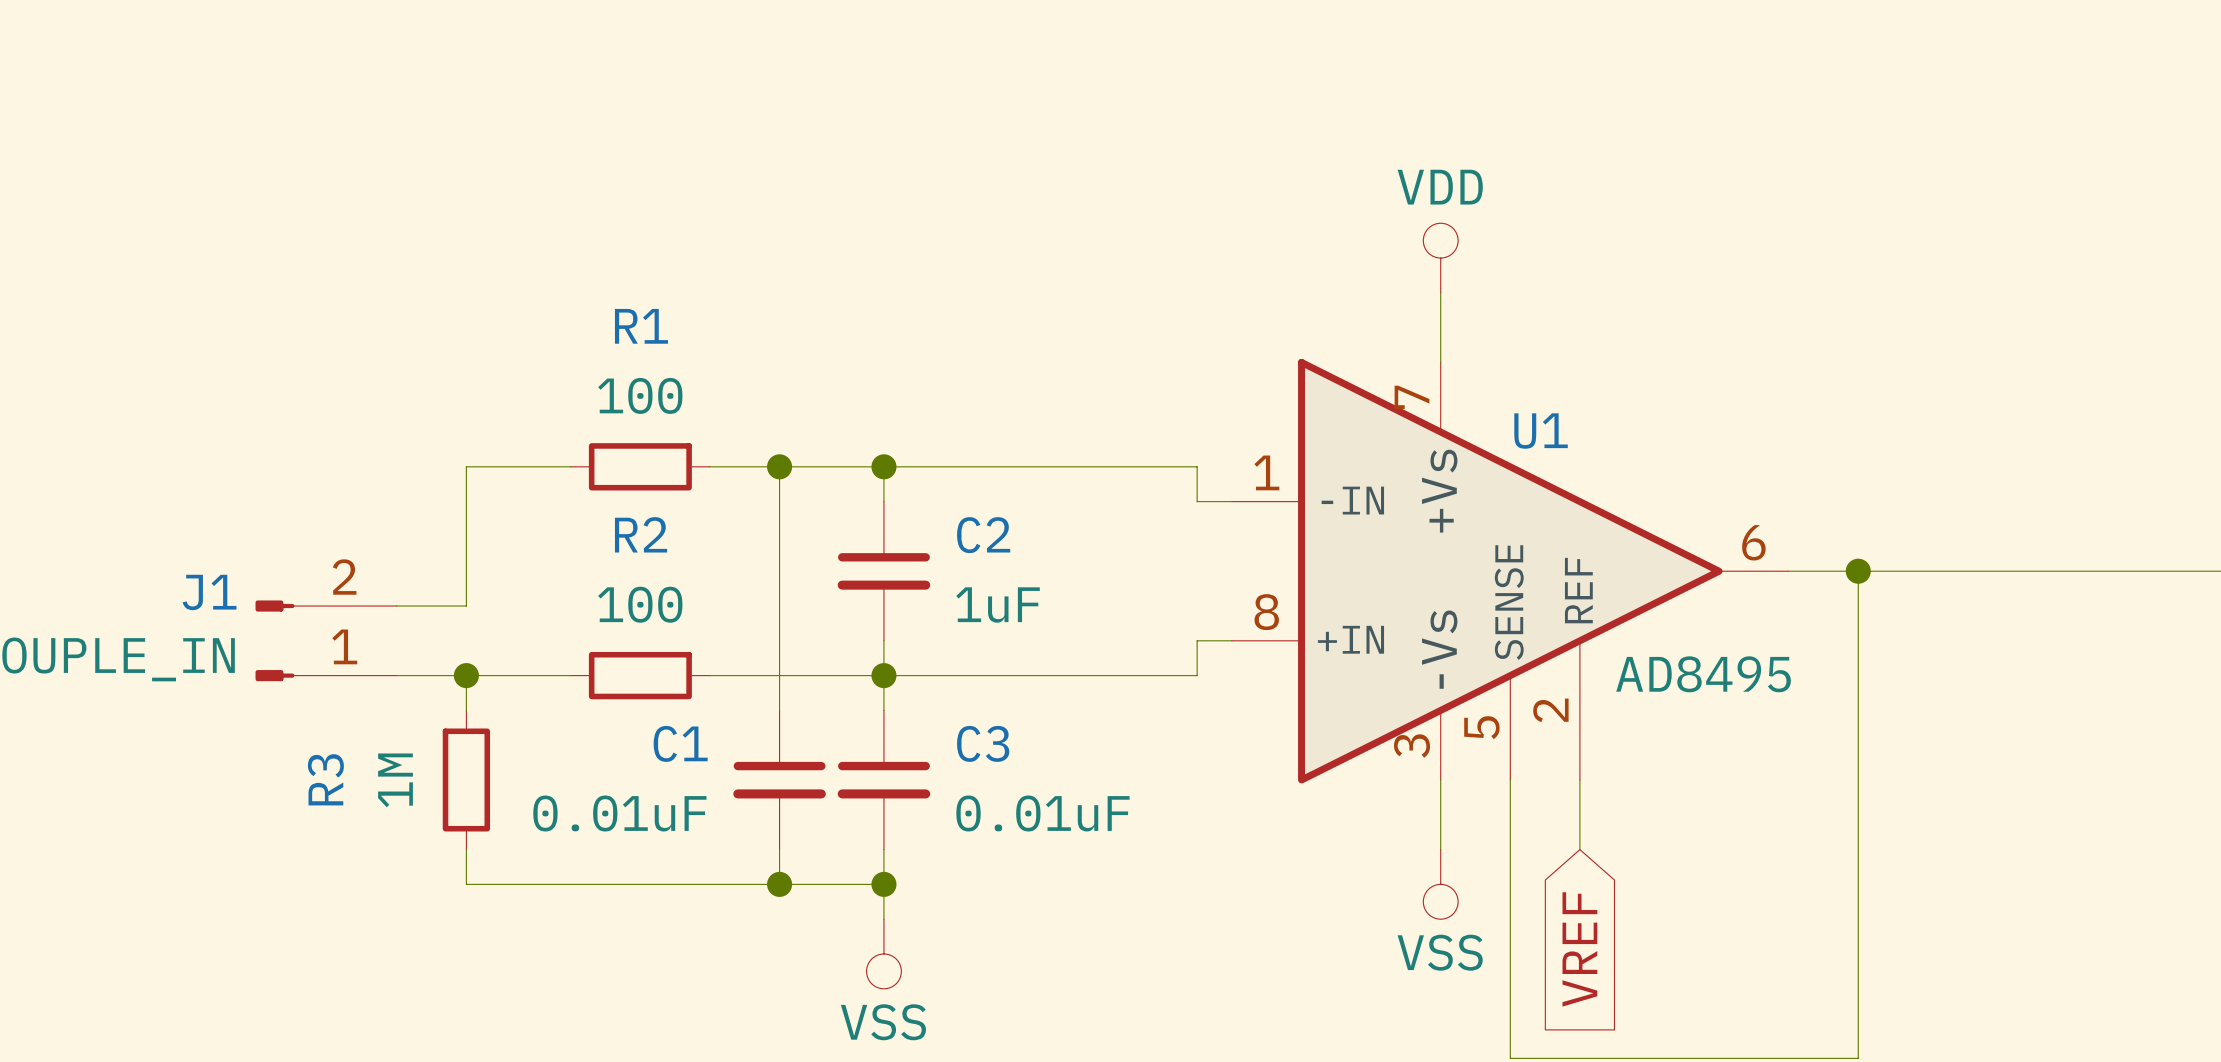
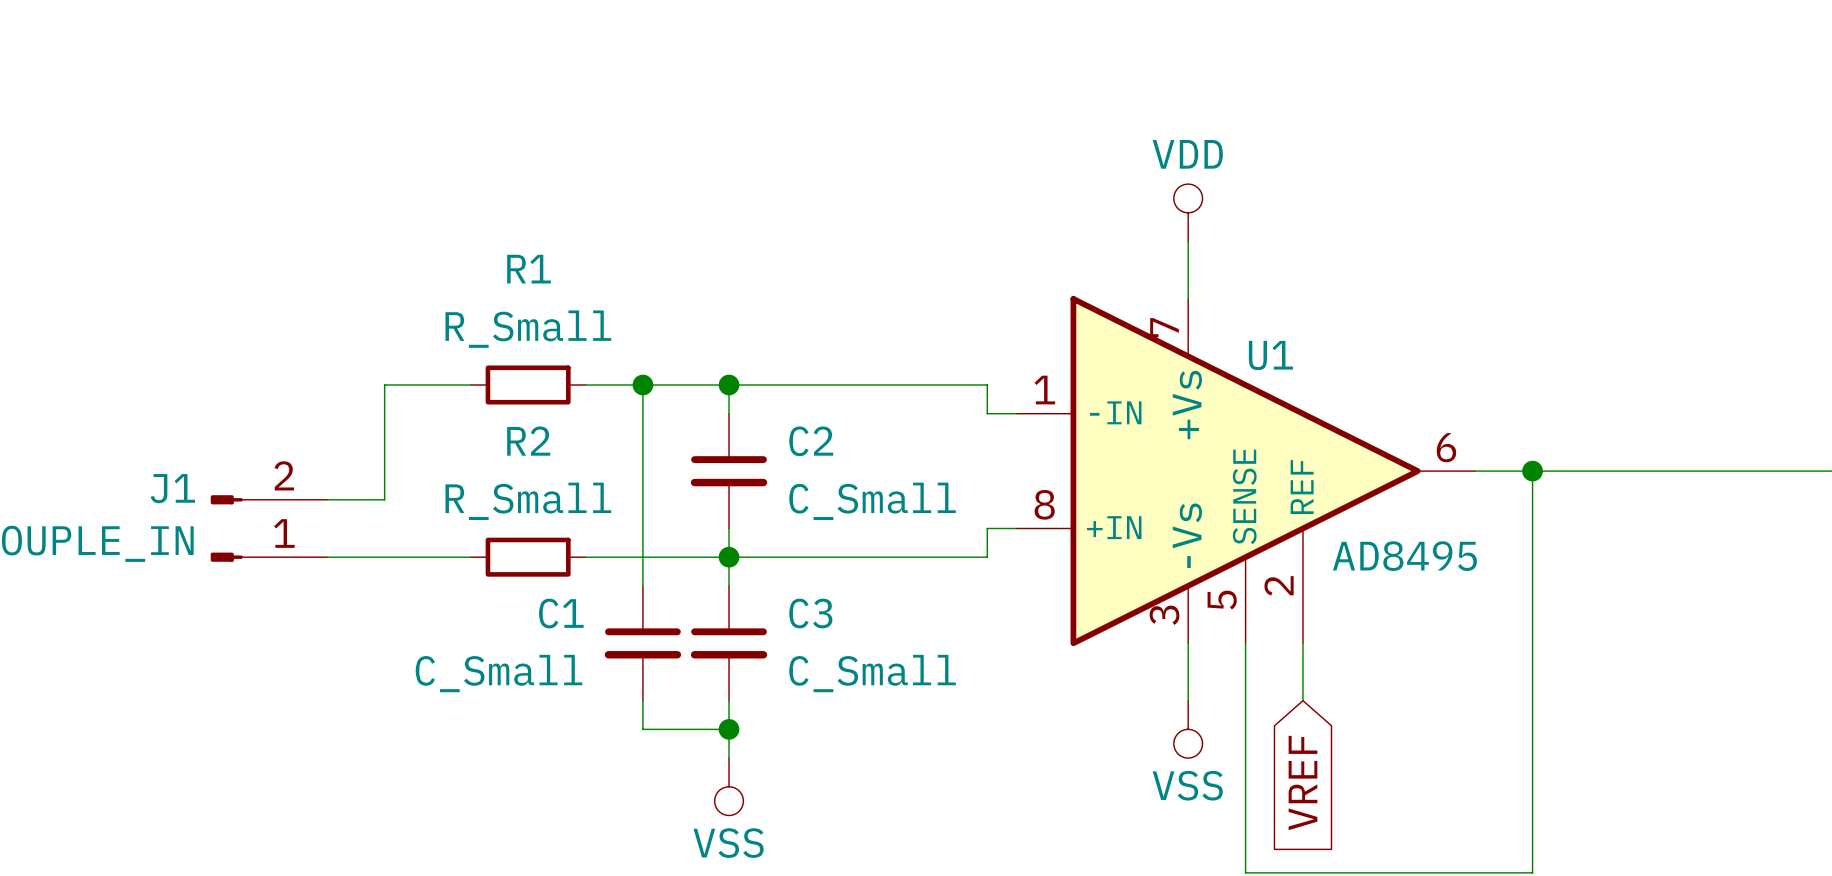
R1 value: 100 (640, 395) -> R_Small (528, 329)
R2 value: 100 (640, 604) -> R_Small (528, 501)
C2 value: 1uF (998, 605) -> C_Small (872, 501)
wire: (466, 675) (466, 710) -> none
junction: (466, 675) -> none
R3: 1M (466, 780) -> none
C1 value: 0.01uF (619, 813) -> C_Small (498, 673)
C3 value: 0.01uF (1042, 813) -> C_Small (872, 673)
wire: (466, 849) (466, 884) (779, 884) -> none
junction: (779, 884) -> none

